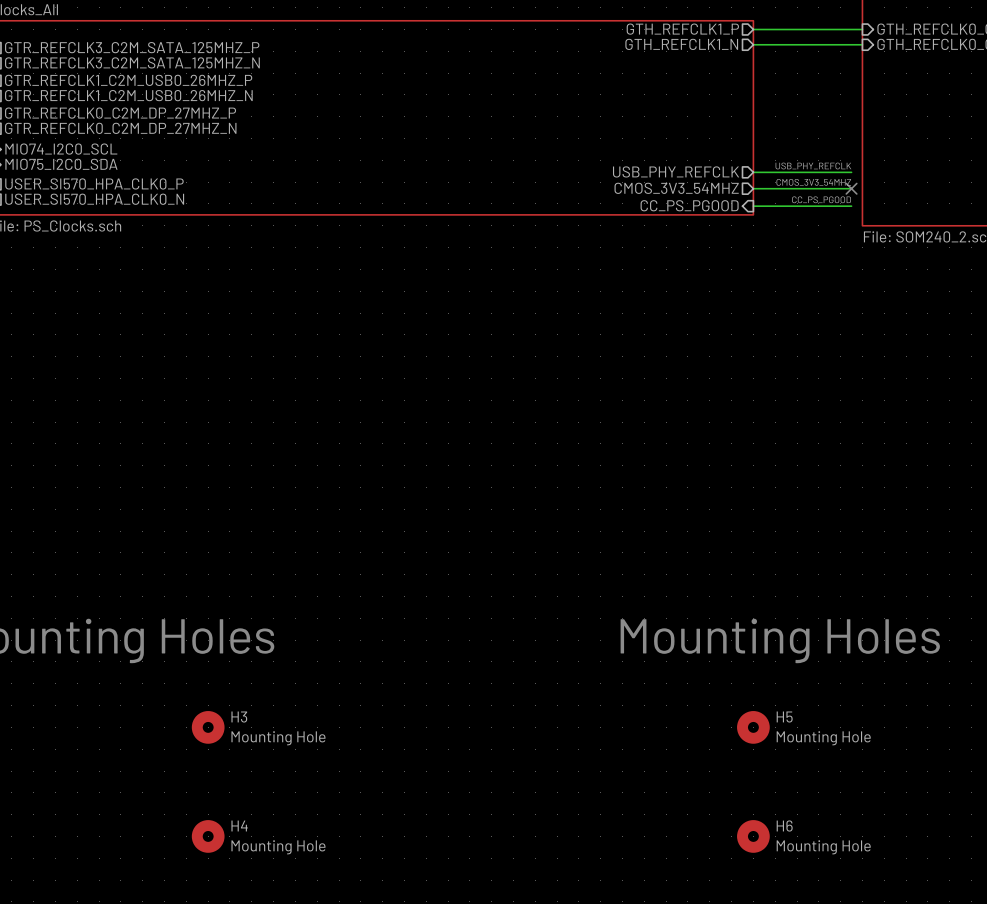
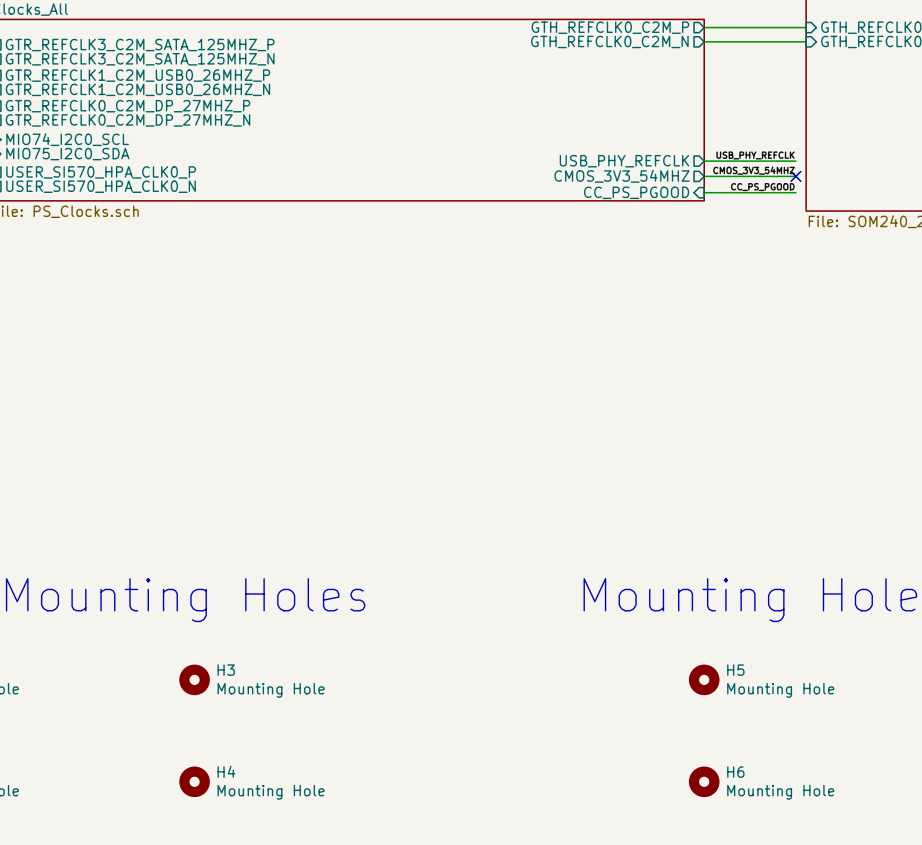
sheet pin: GTH_REFCLK1_P (682, 29) -> GTH_REFCLK0_C2M_P (610, 27)
sheet pin: GTH_REFCLK1_N (681, 44) -> GTH_REFCLK0_C2M_N (609, 41)

